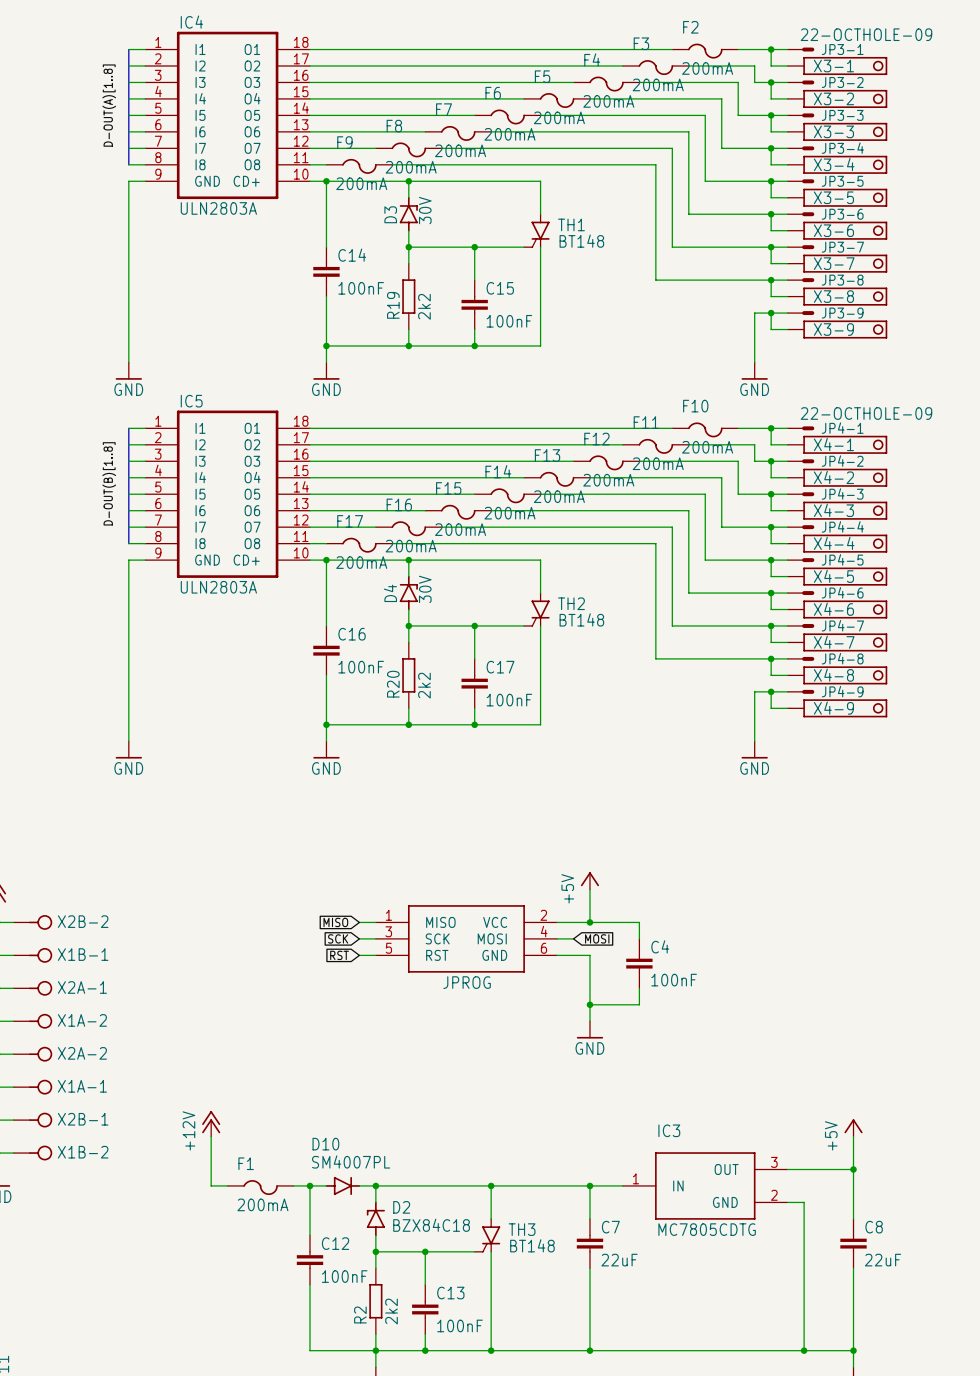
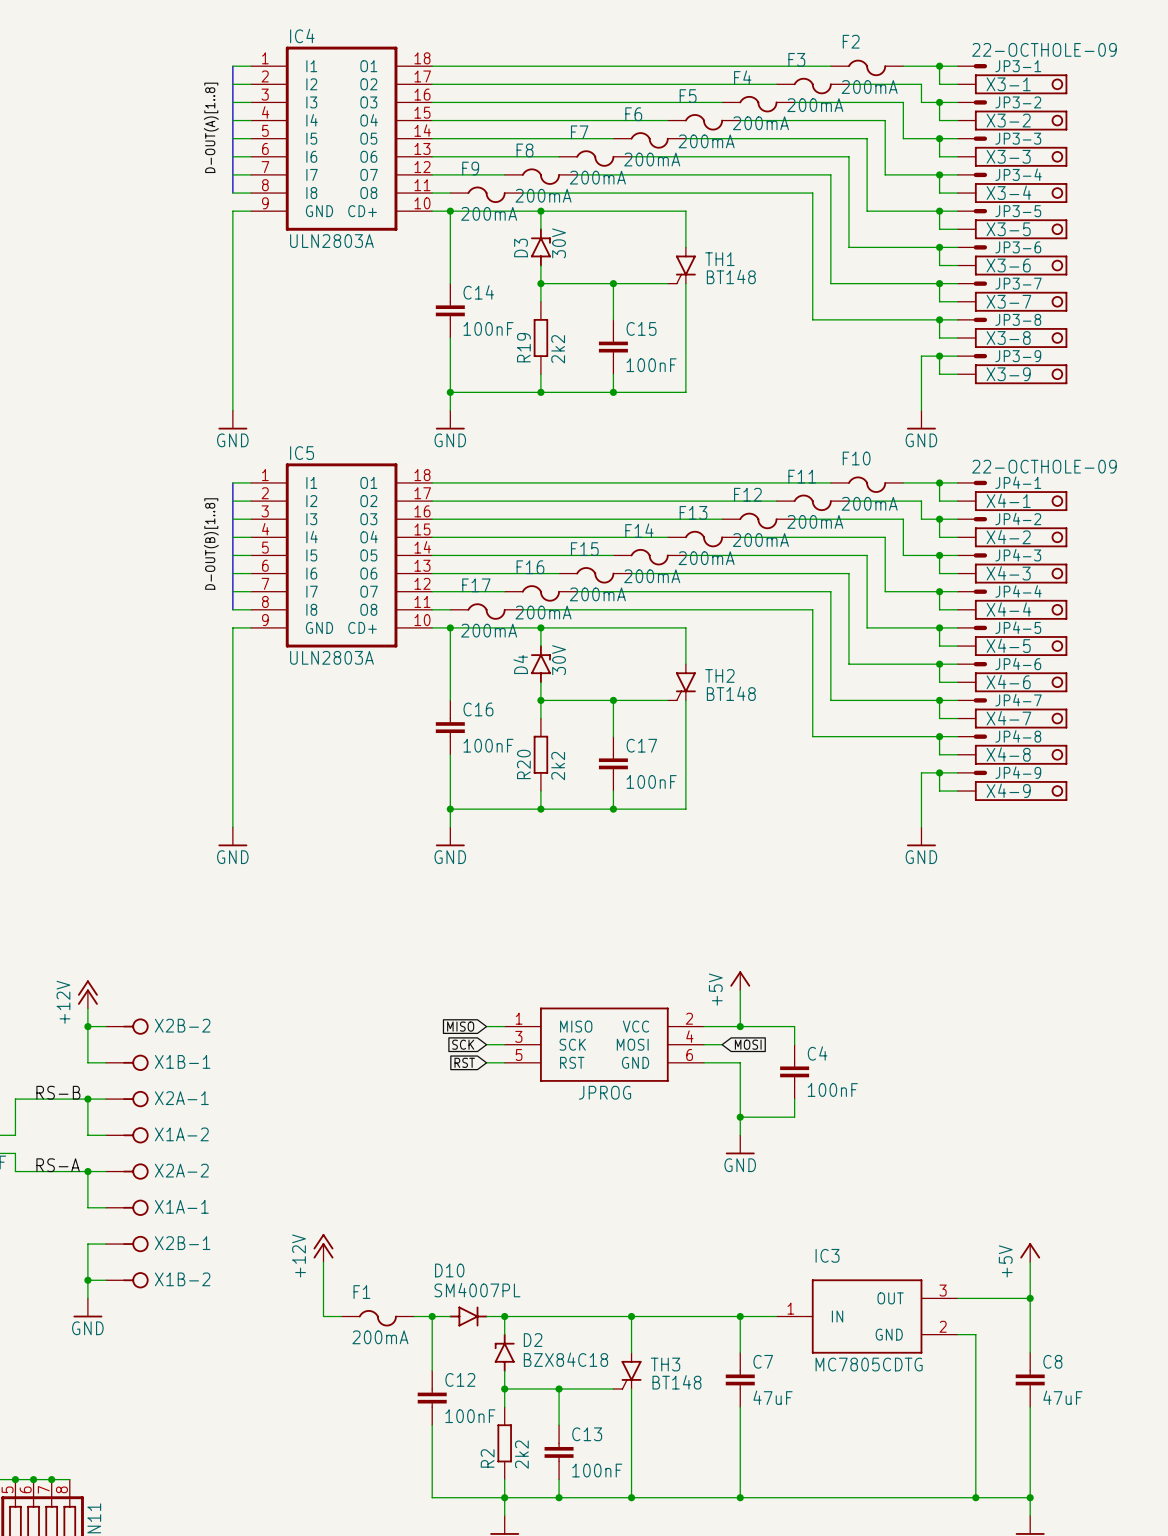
C7 value: 22uF (619, 1260) -> 47uF (773, 1397)
C8 value: 22uF (883, 1260) -> 47uF (1062, 1397)

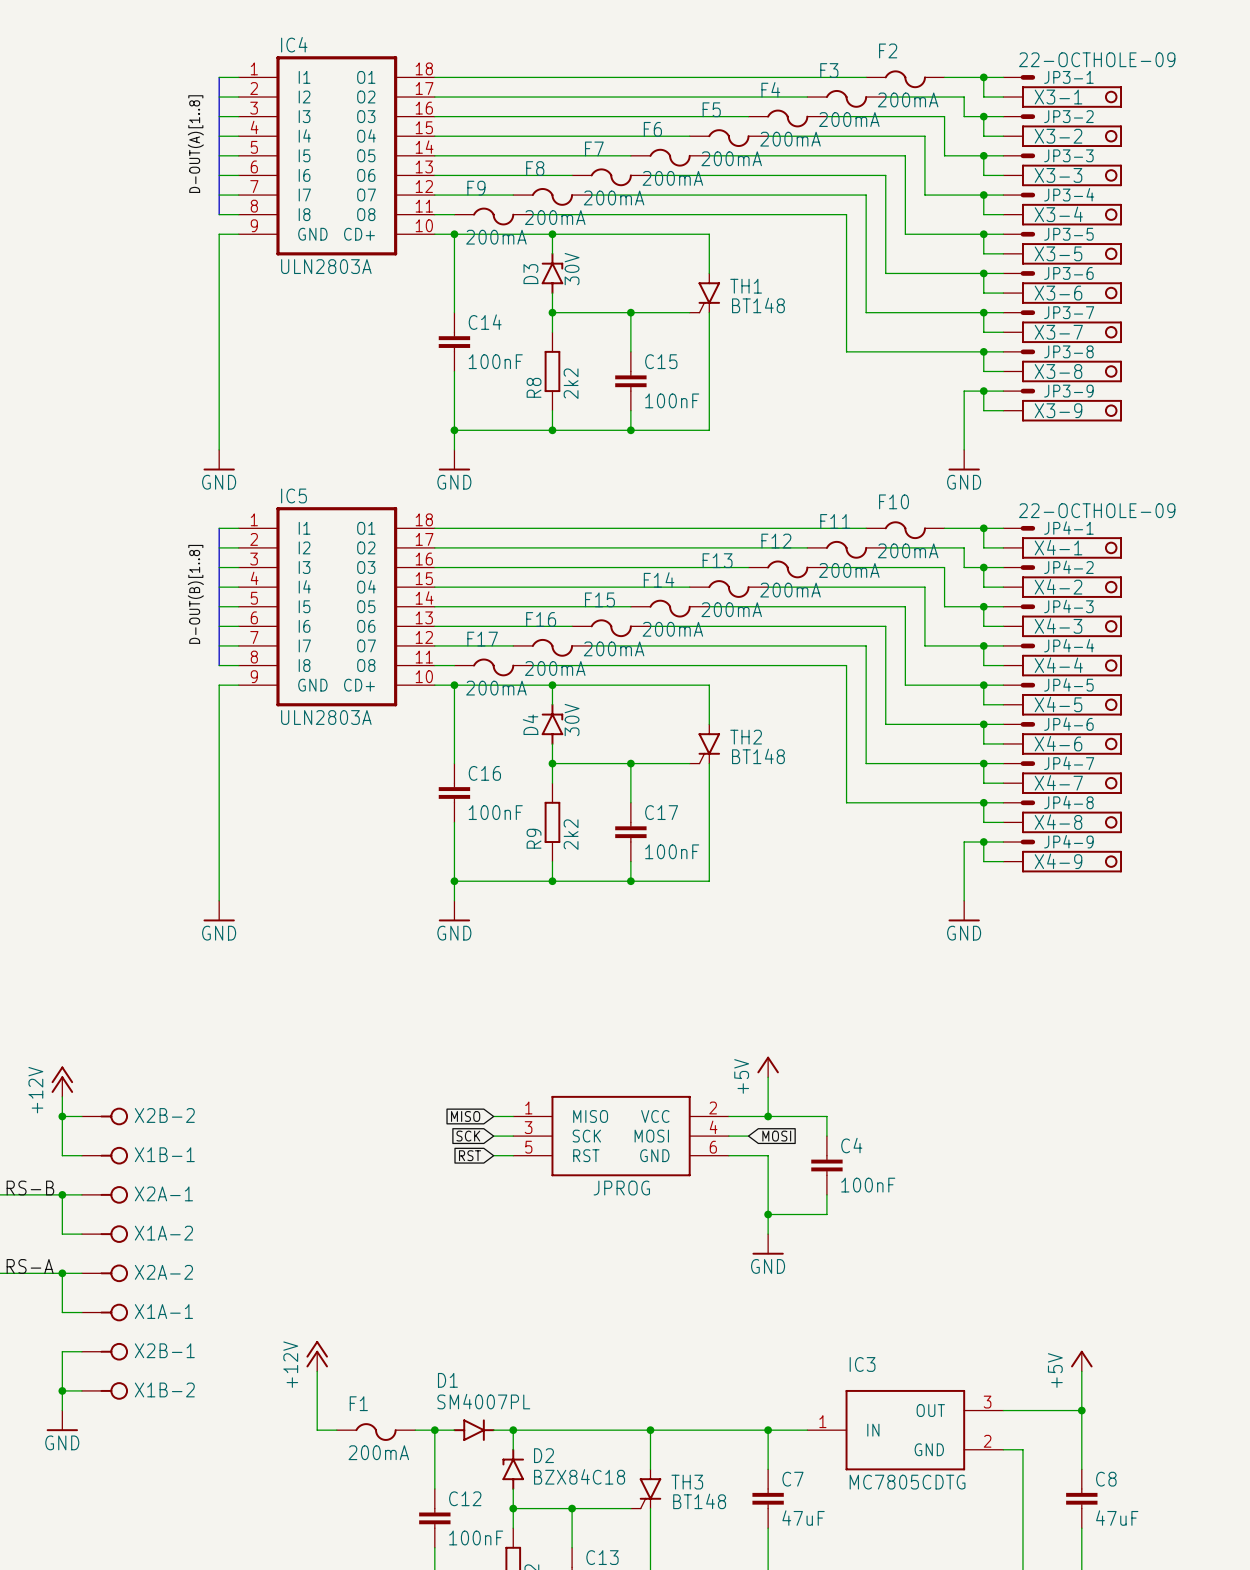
R19 name: R19 (523, 347) -> R8 (534, 387)
R20 name: R20 (523, 764) -> R9 (534, 838)
D10 name: D10 (449, 1270) -> D1 (447, 1380)

